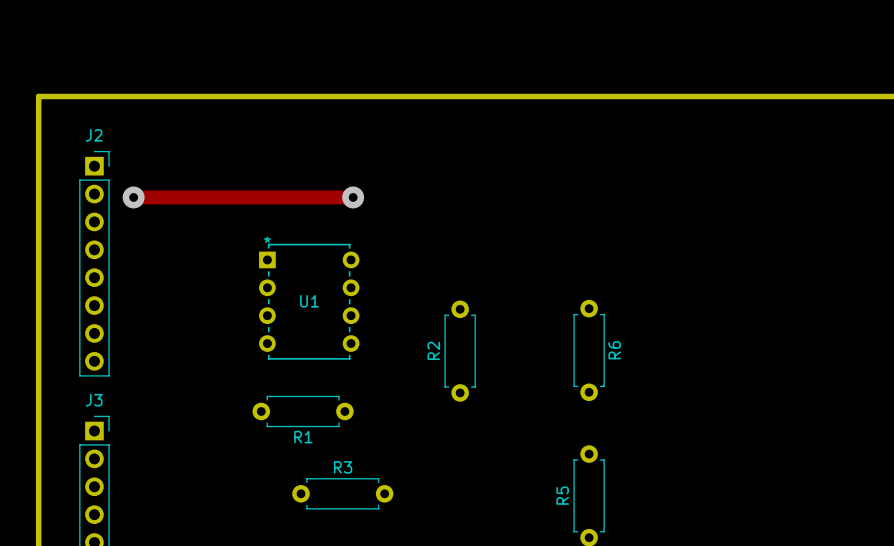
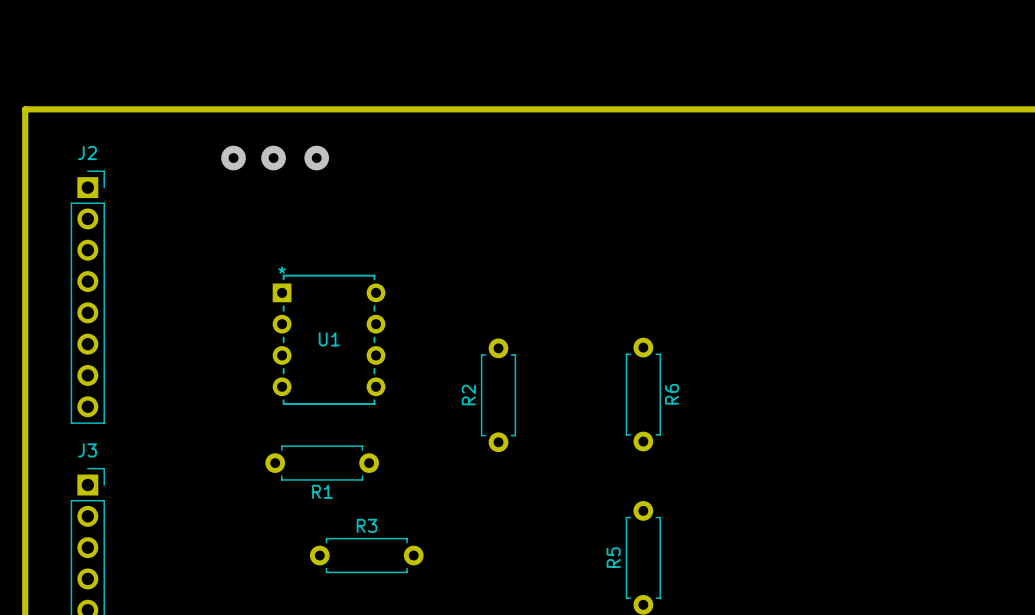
via: none -> (233, 158)
via: none -> (273, 158)
via: none -> (316, 158)
track: (133, 197) (353, 197) -> none
via: (133, 197) -> none
via: (353, 197) -> none

